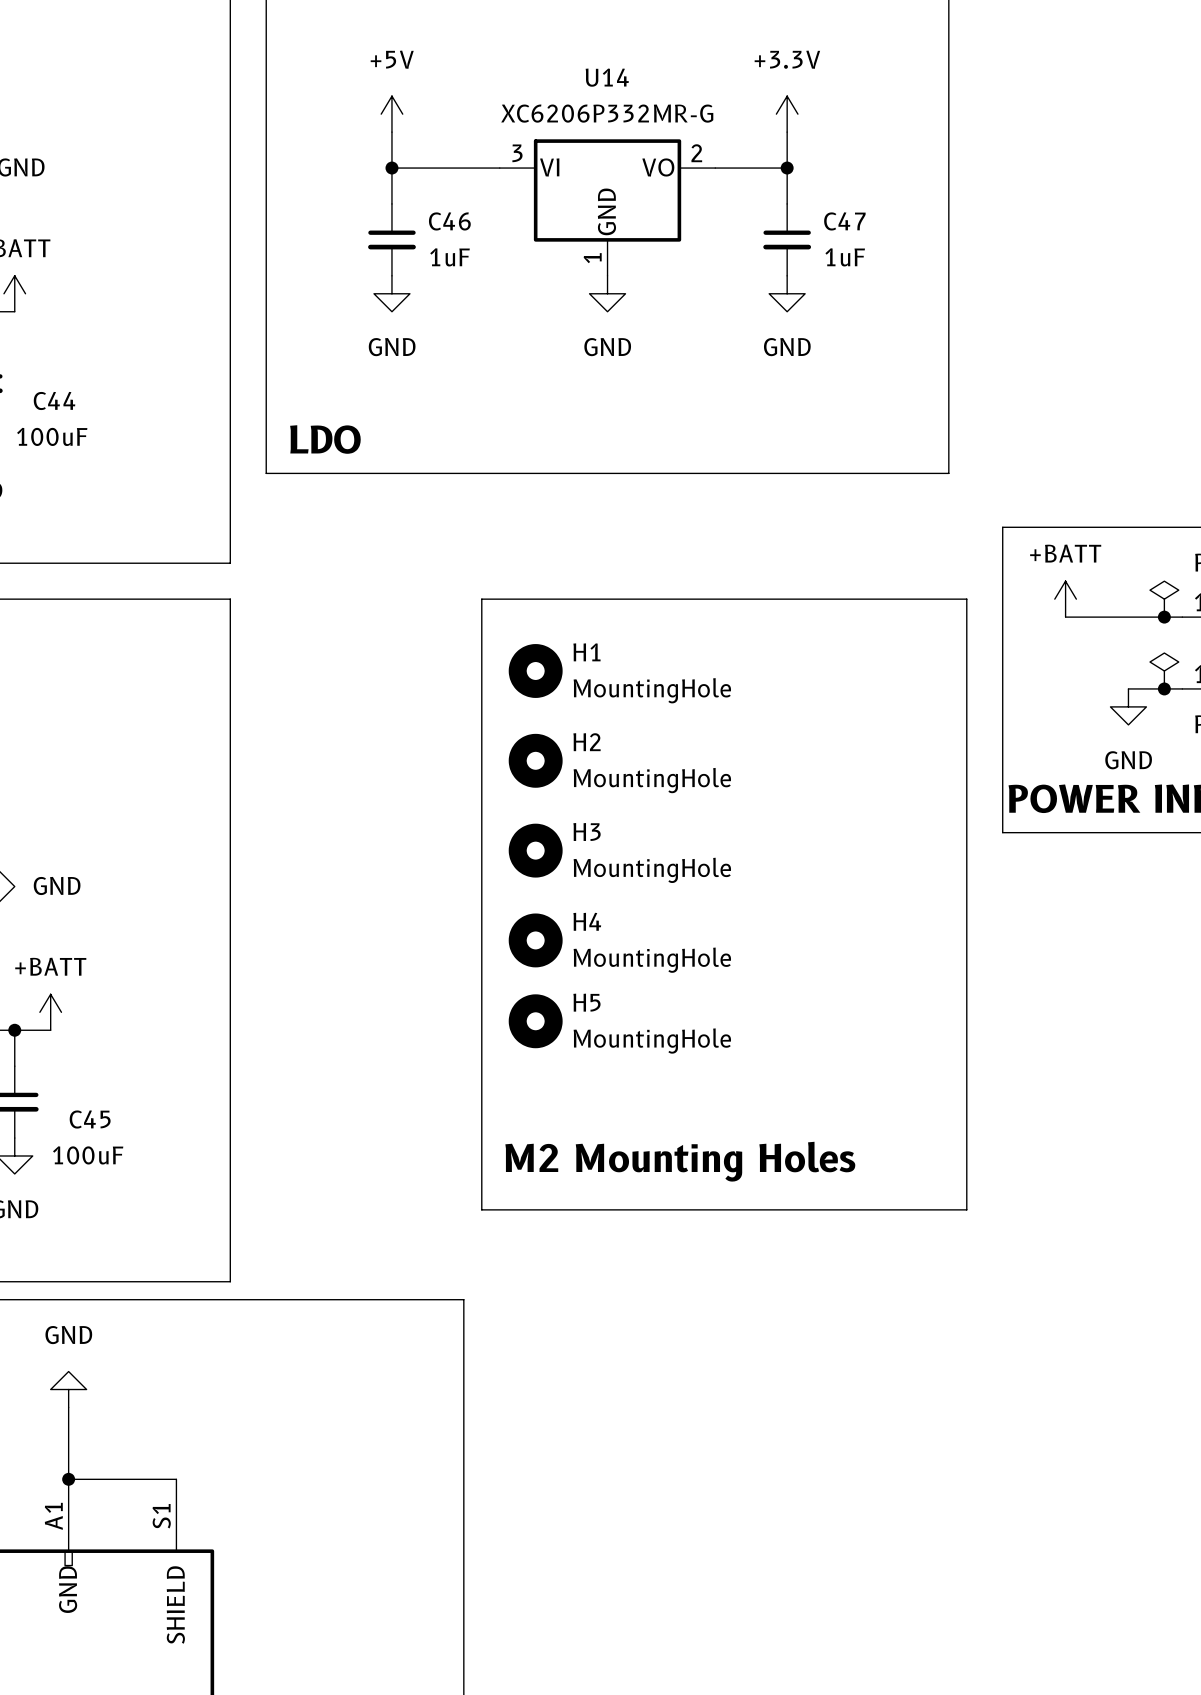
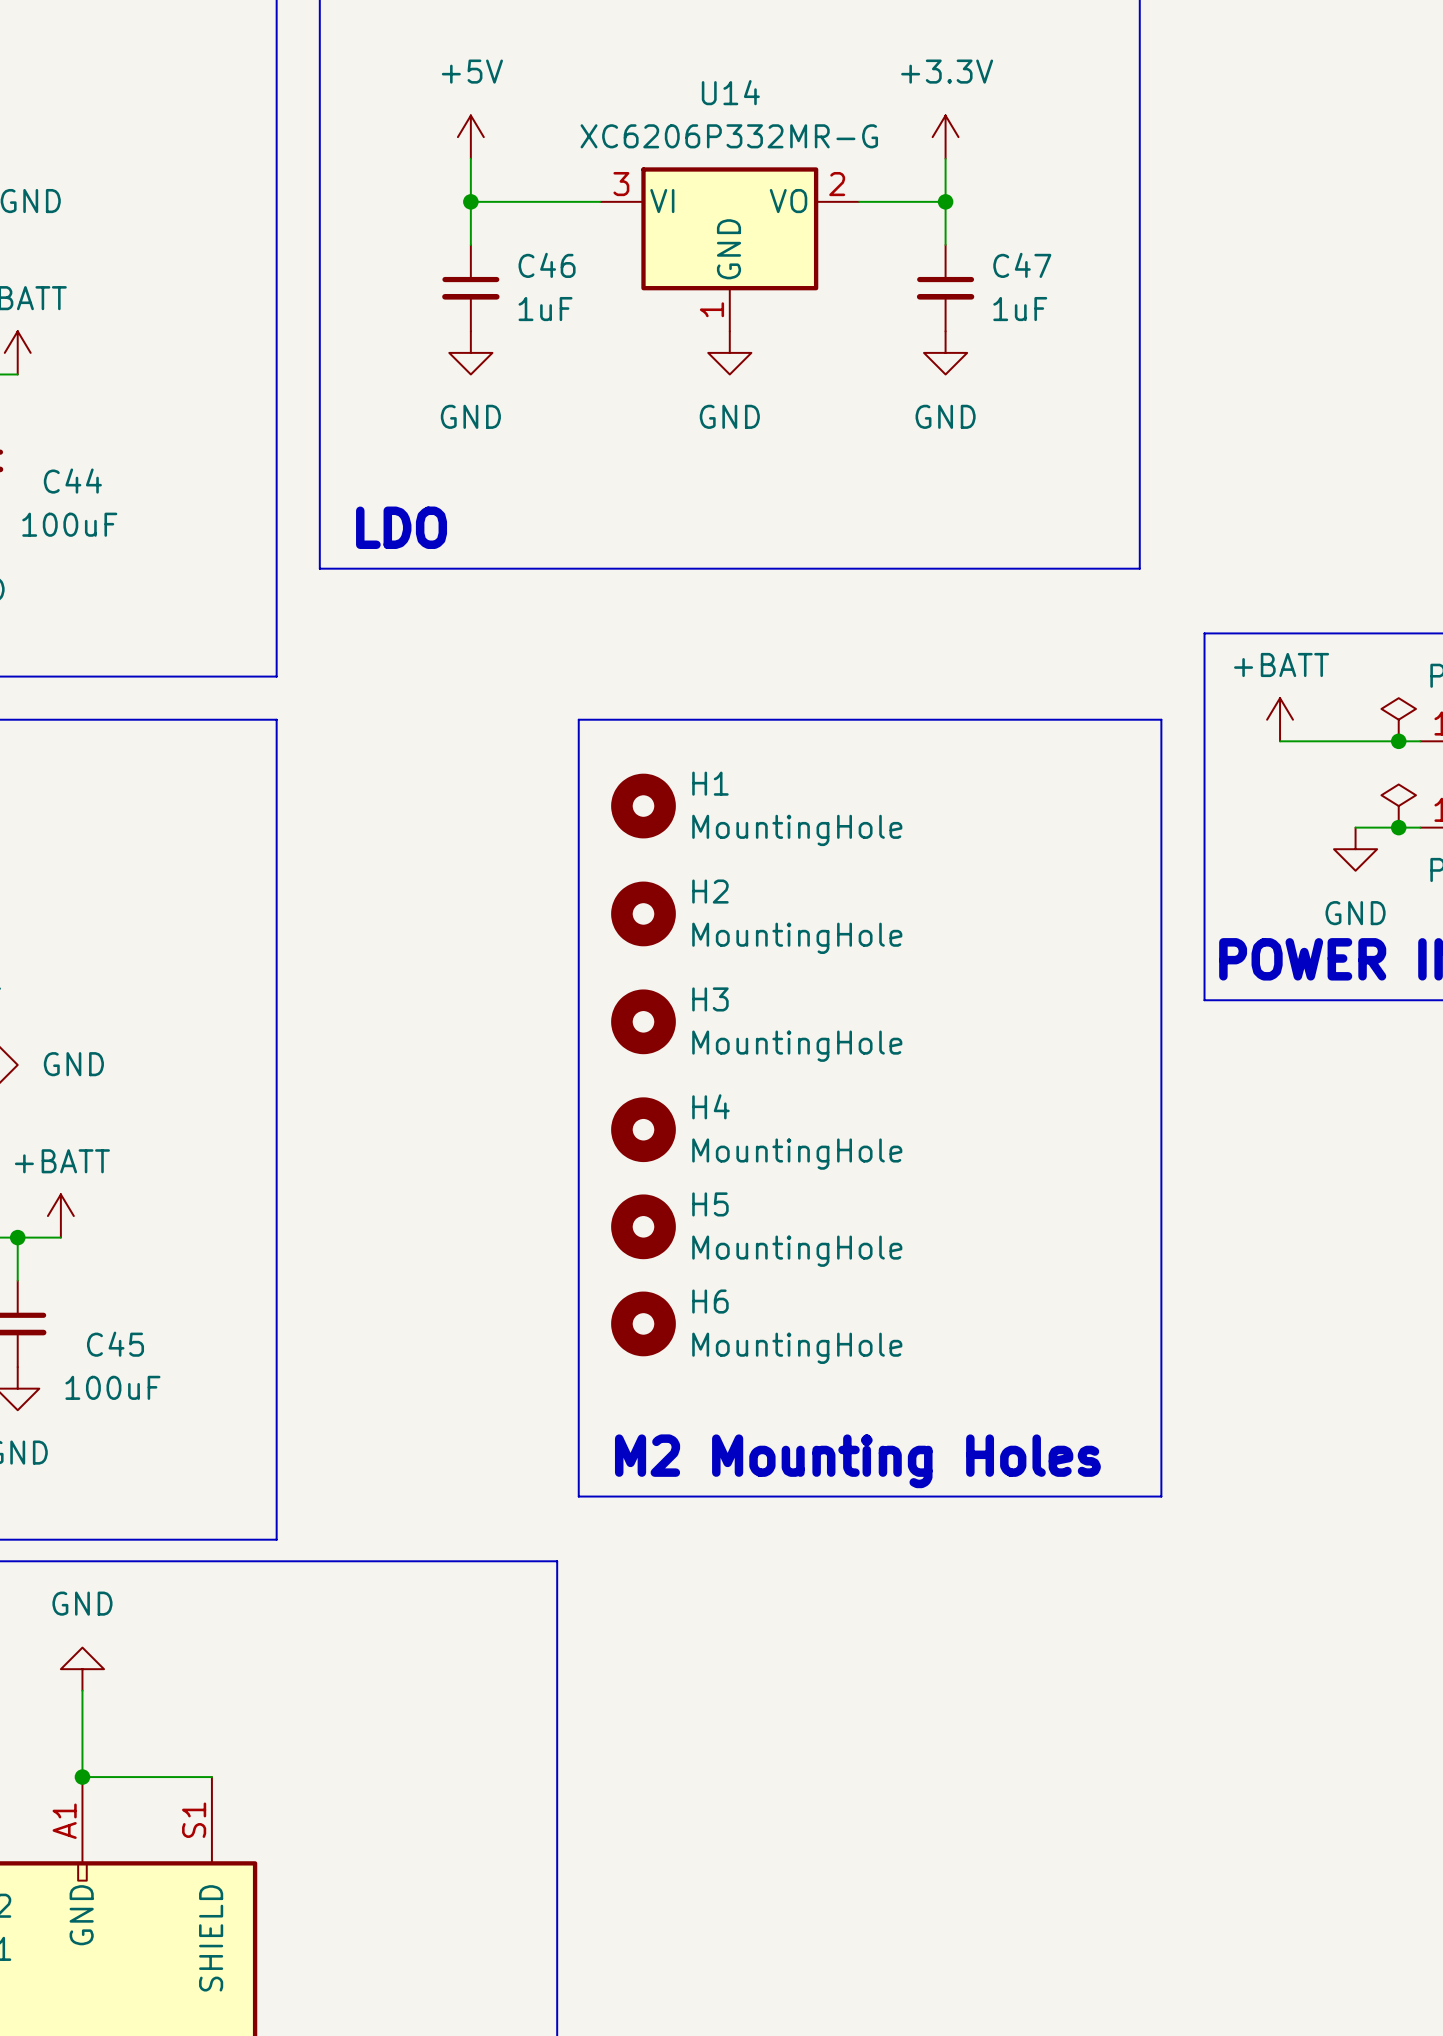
H6: none -> MountingHole (643, 1323)
text position: M2 Mounting Holes (680, 1161) -> M2 Mounting Holes (857, 1461)
line: (481, 1209) (966, 1209) -> (578, 1453) (578, 1496) (1161, 1496) (1161, 1453)

